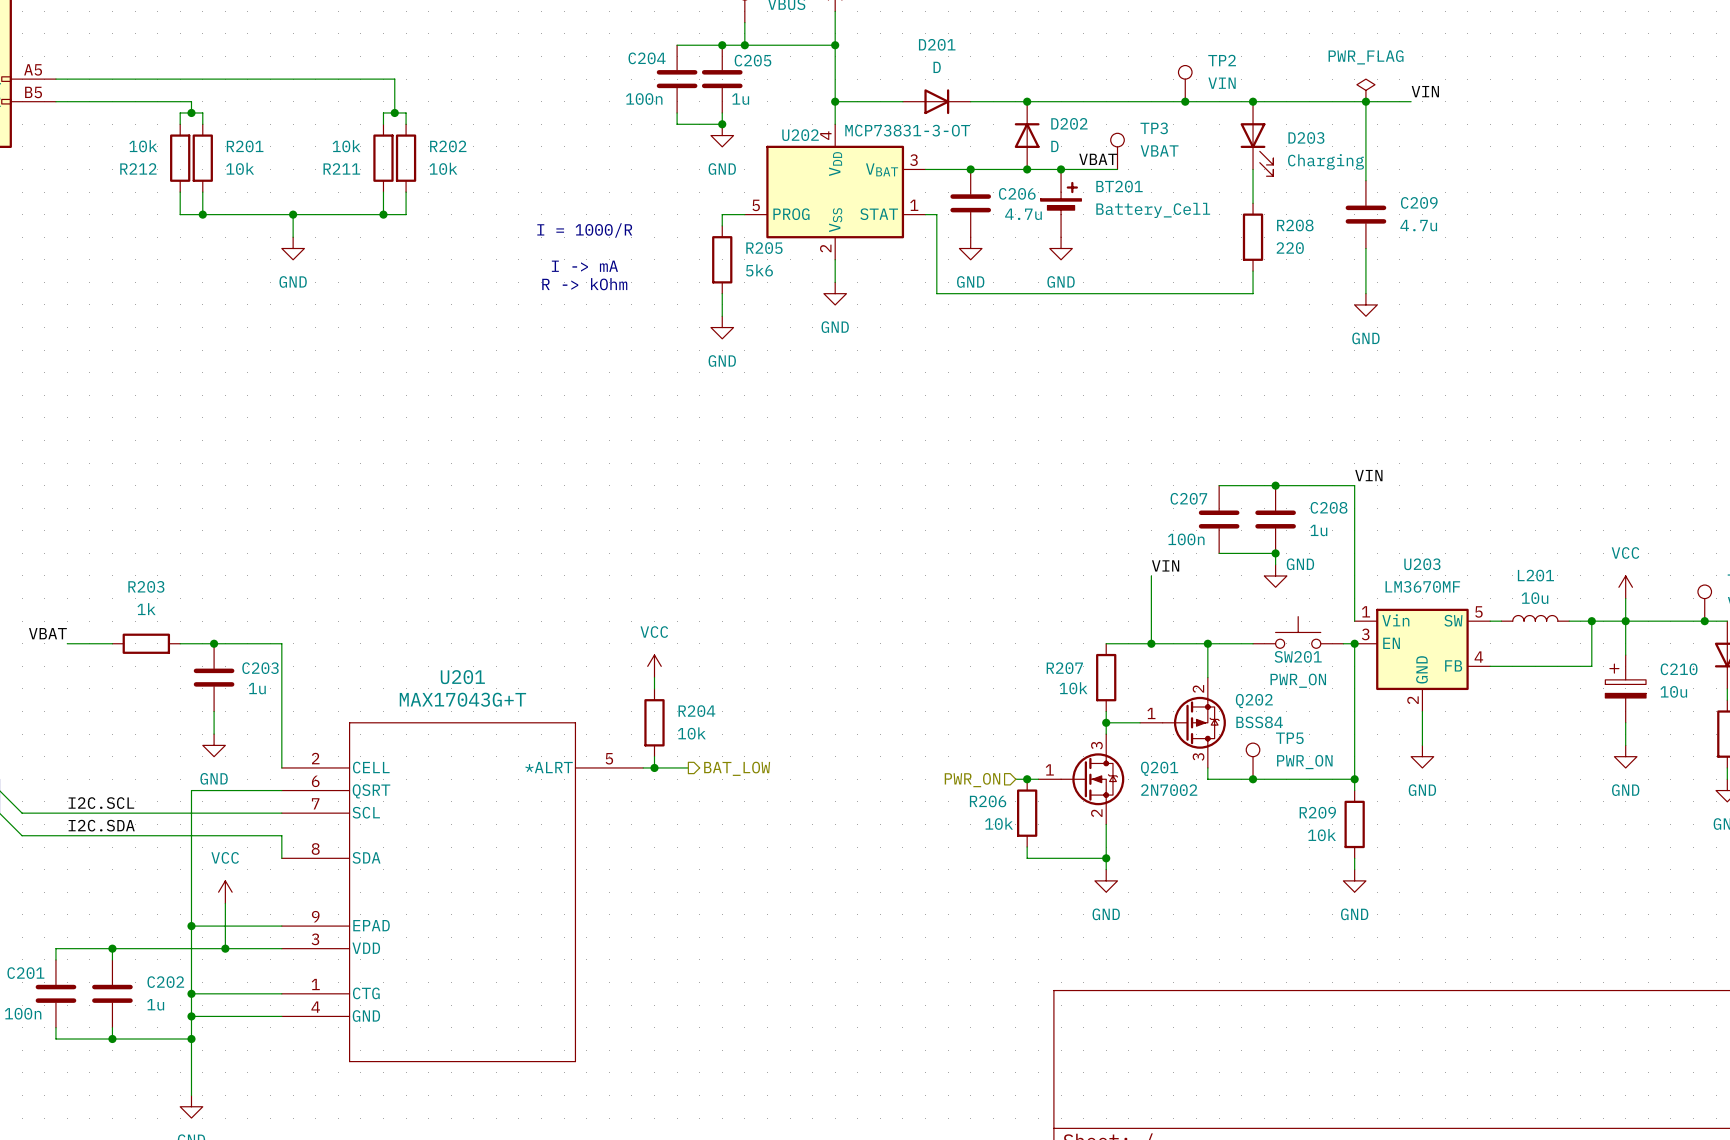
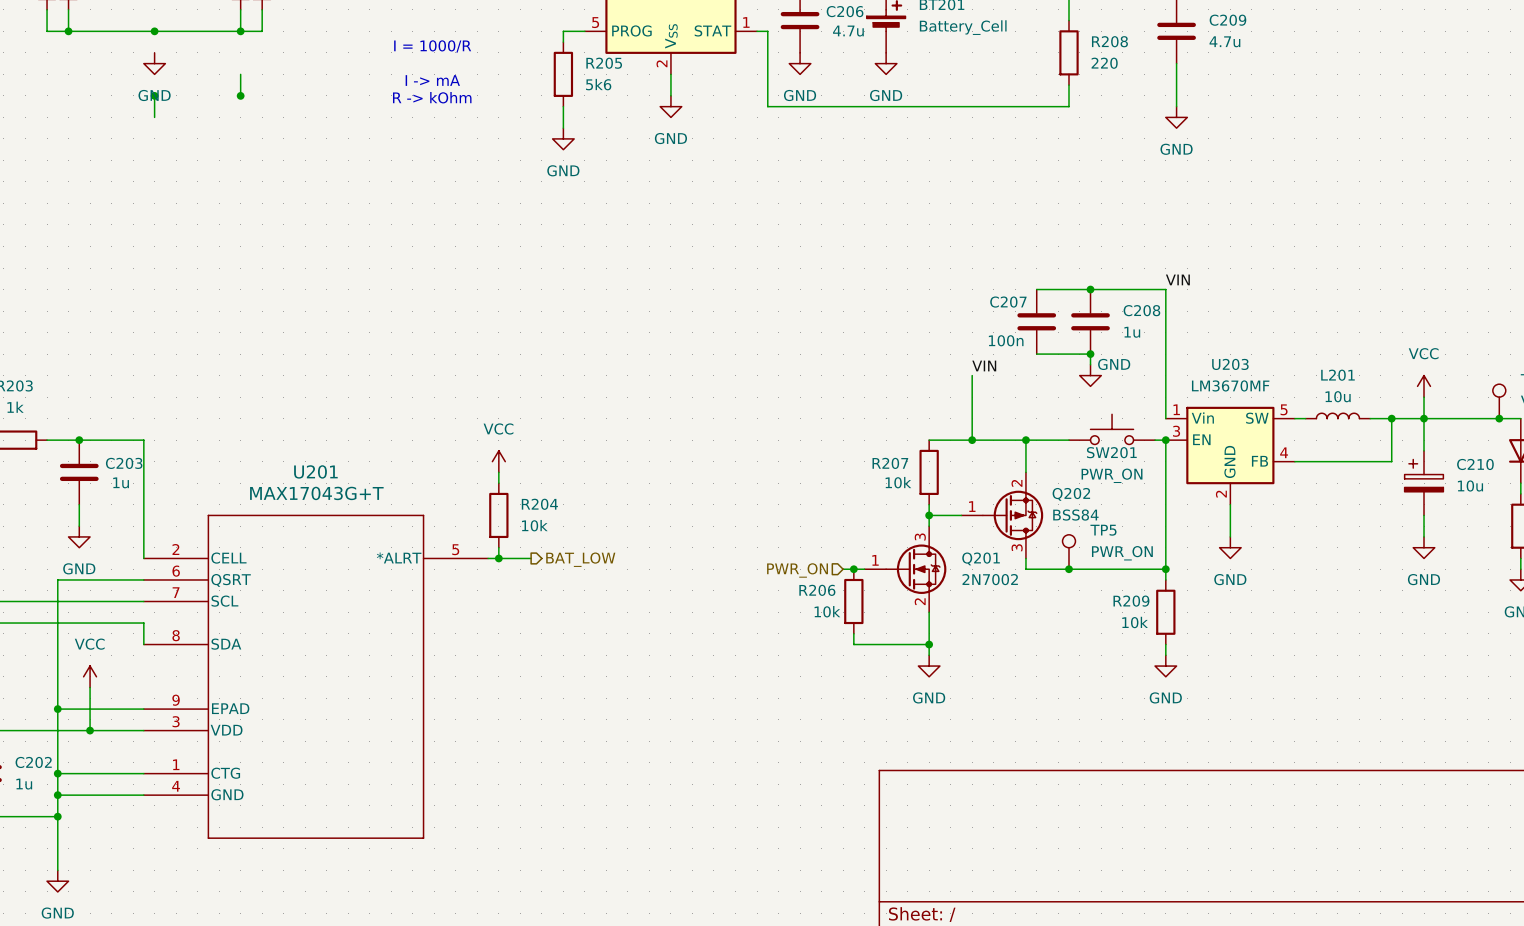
wire: (293, 214) (293, 237) -> (154, 95) (154, 117)
wire: none -> (240, 74) (240, 95)
junction: none -> (154, 95)
junction: none -> (240, 95)

